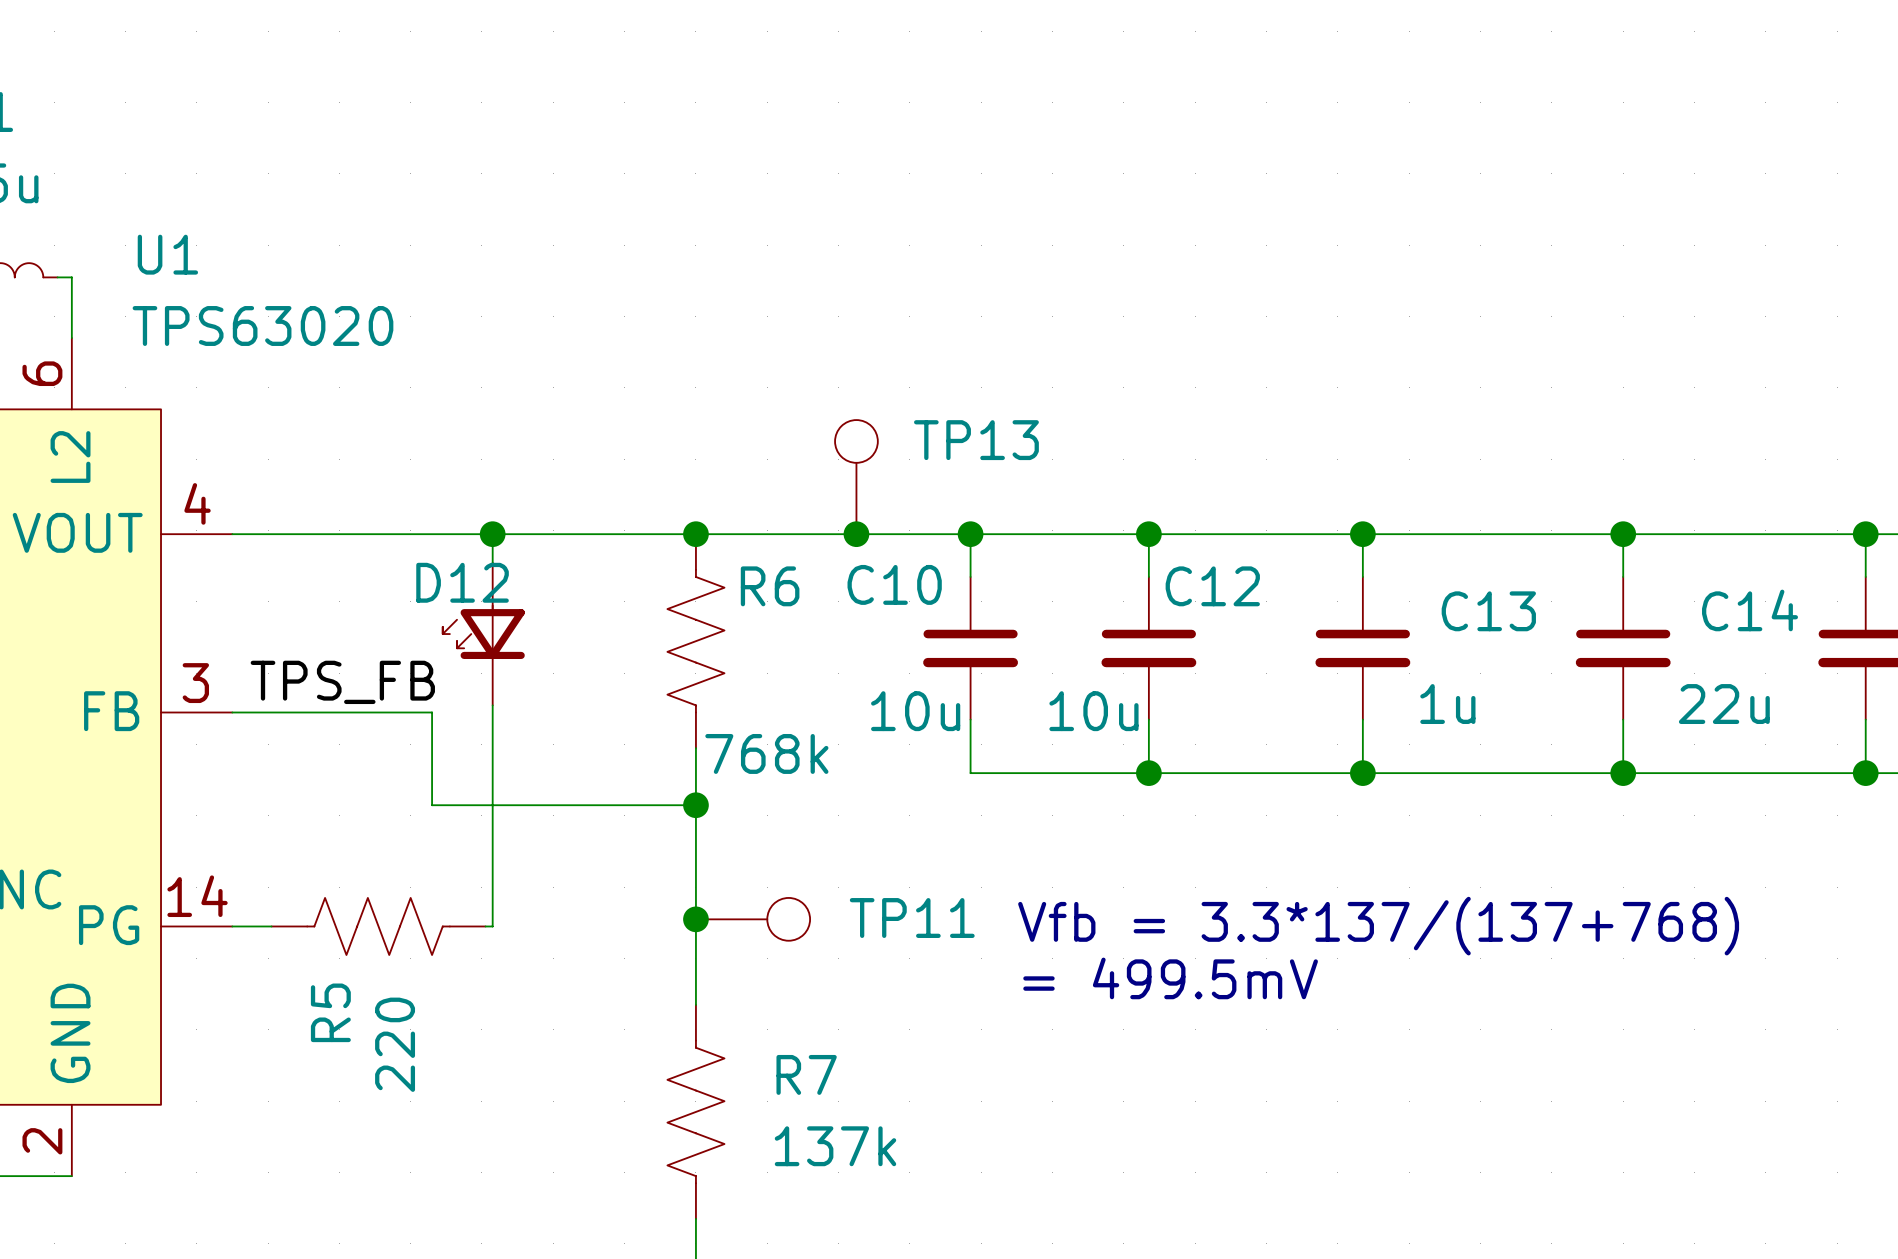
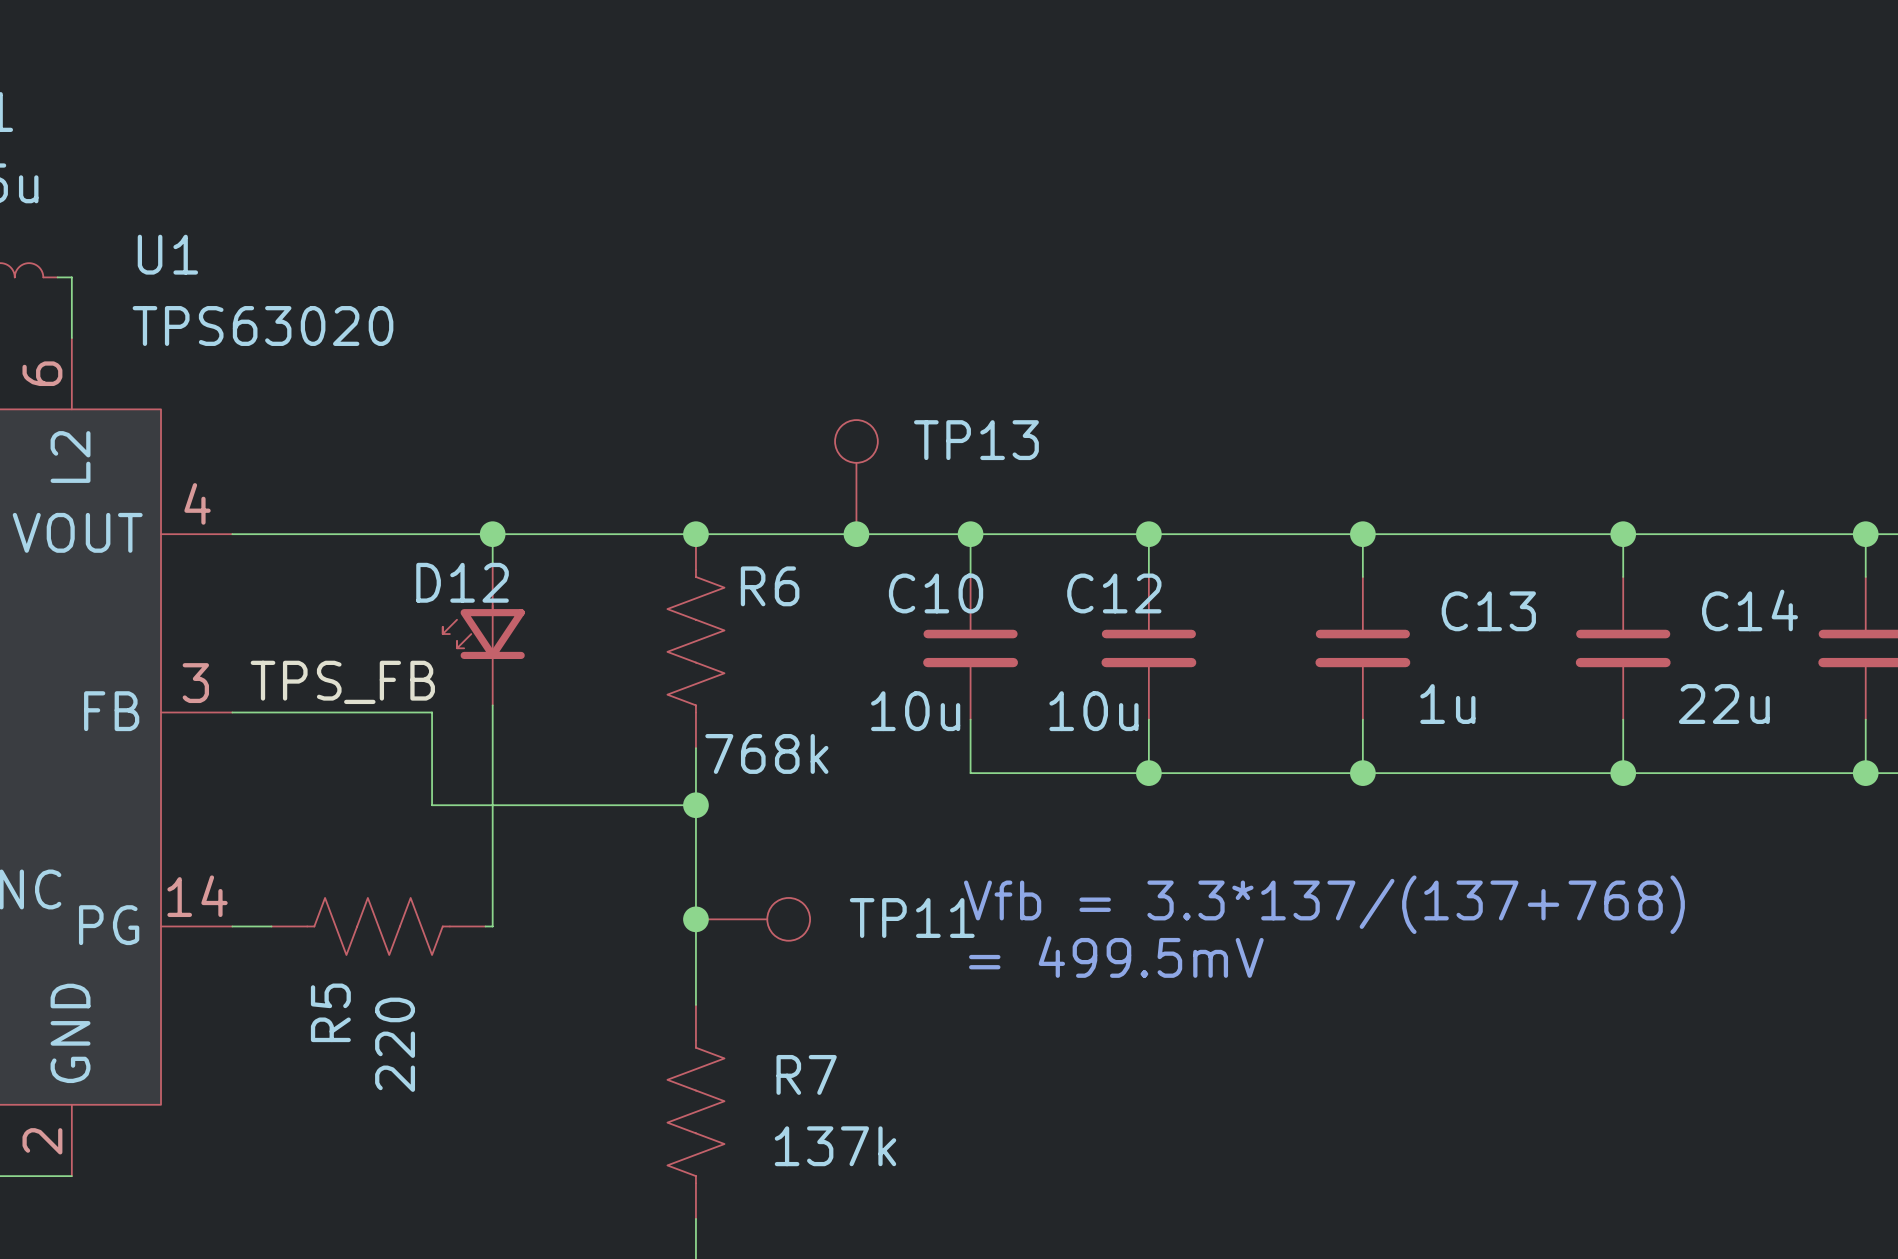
C10 name position: C10 (894, 584) -> C10 (936, 593)
C12 name position: C12 (1212, 586) -> C12 (1114, 593)
text position: Vfb = 3.3*137/(137+768) (1378, 926) -> Vfb = 3.3*137/(137+768) (1324, 904)
text position: = 499.5mV (1170, 978) -> = 499.5mV (1116, 957)

